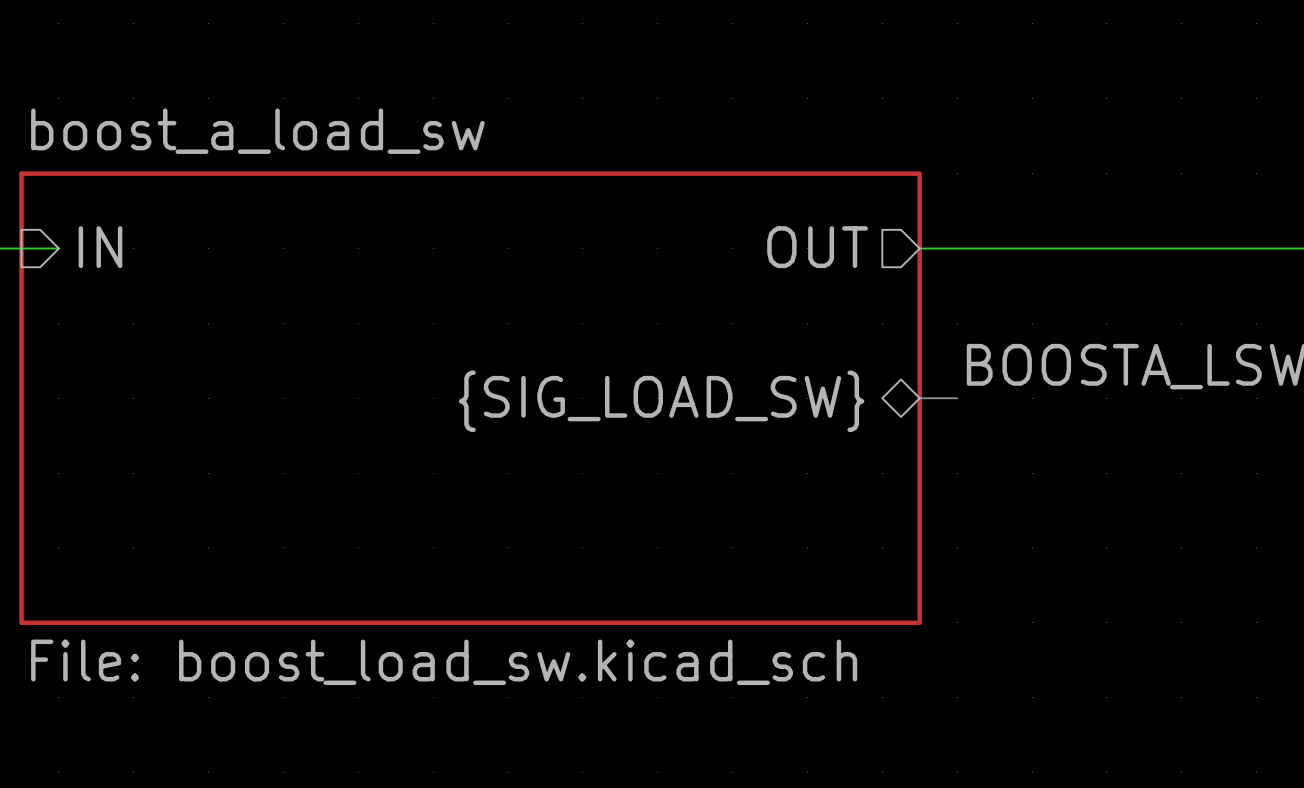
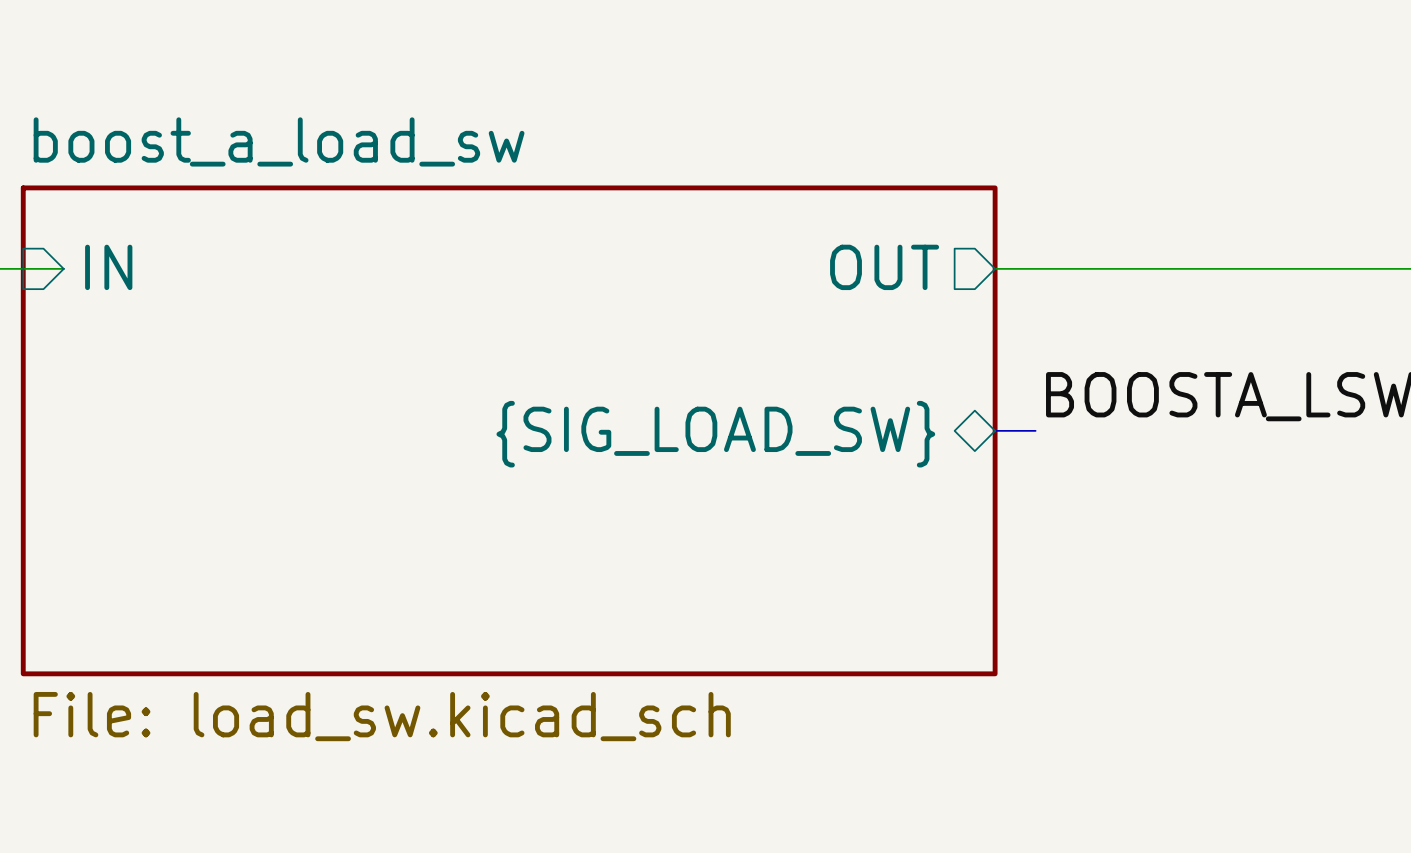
sheet boost_a_load_sw value: File: boost_load_sw.kicad_sch (444, 662) -> File: load_sw.kicad_sch (382, 716)

